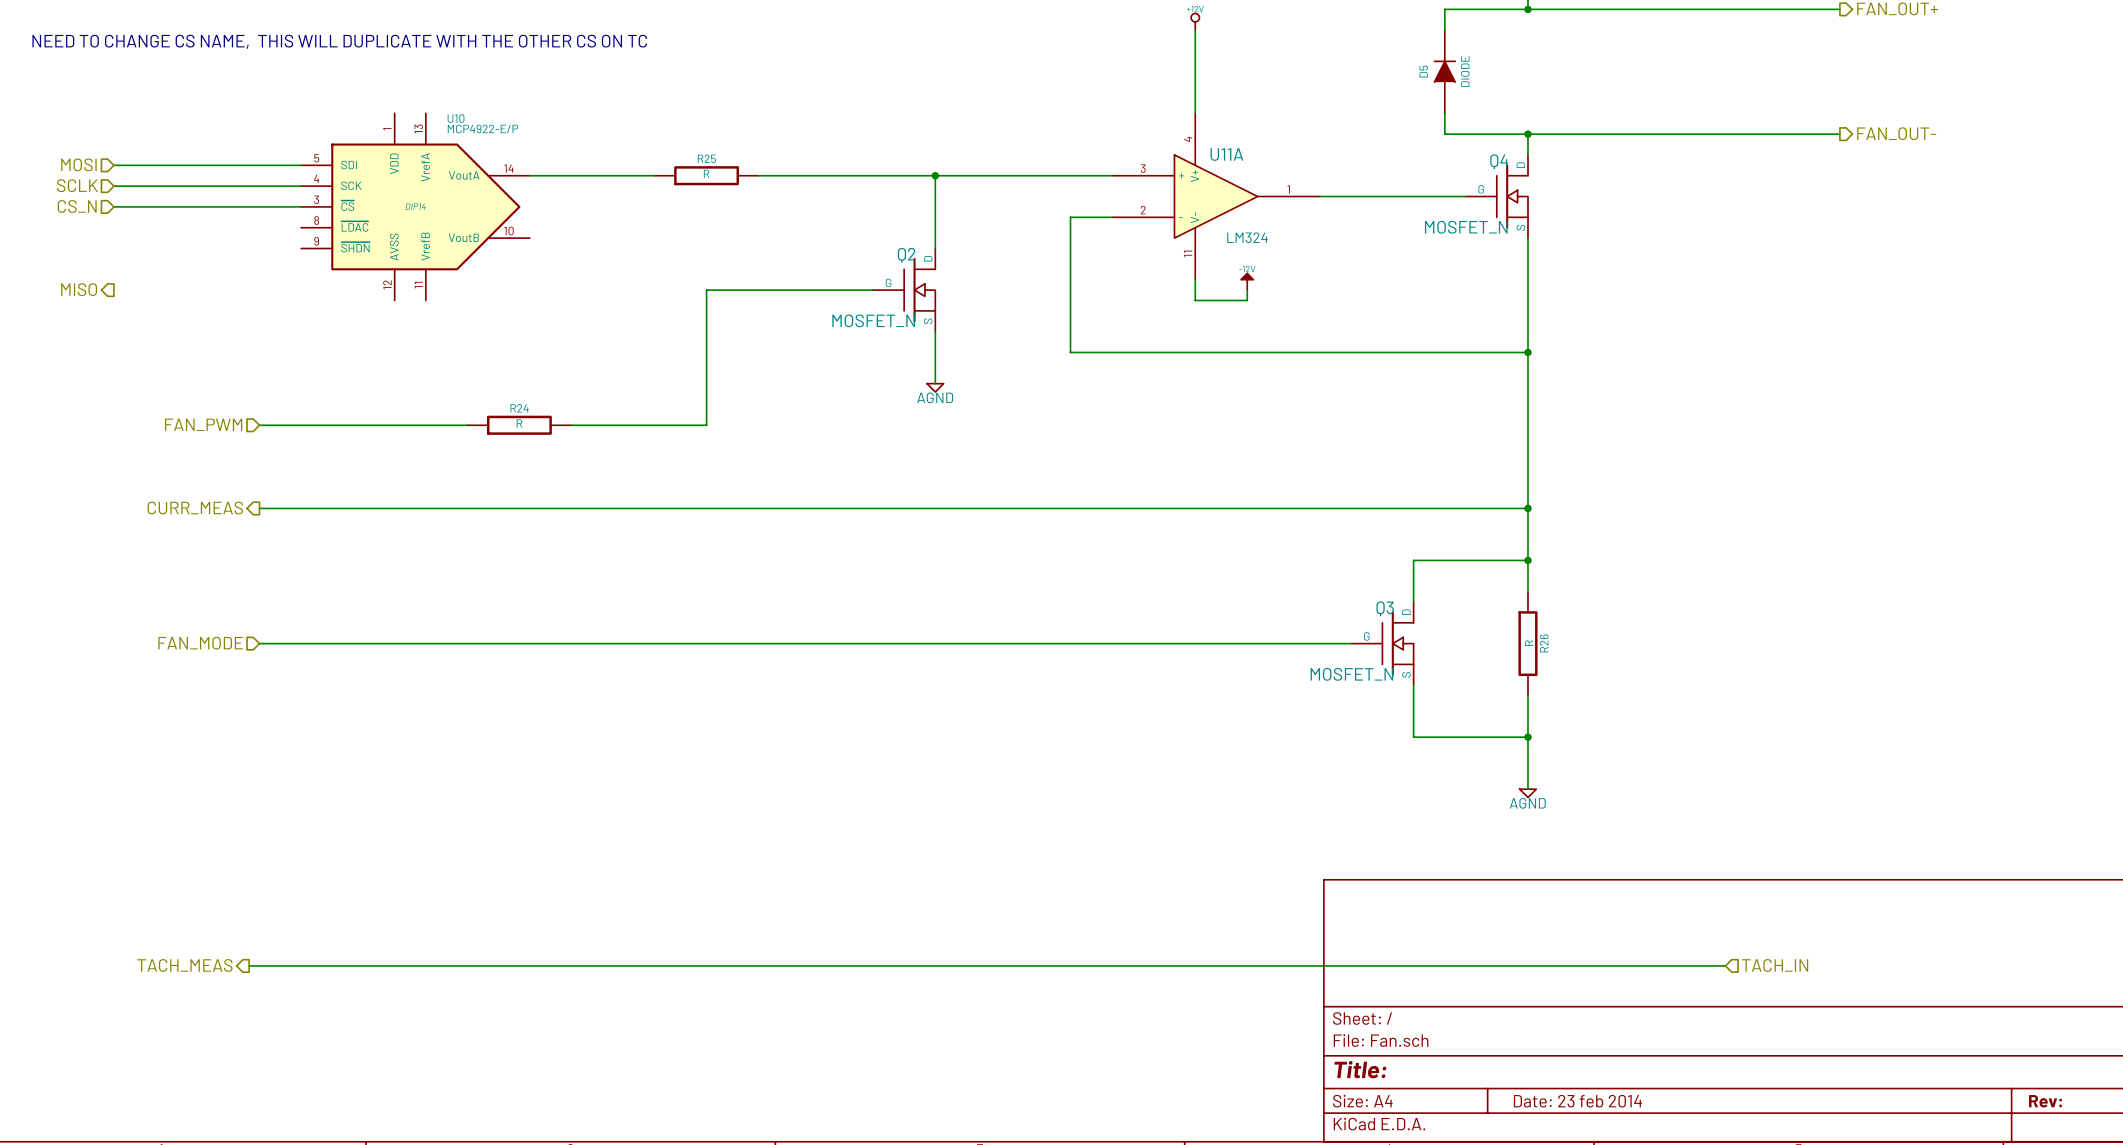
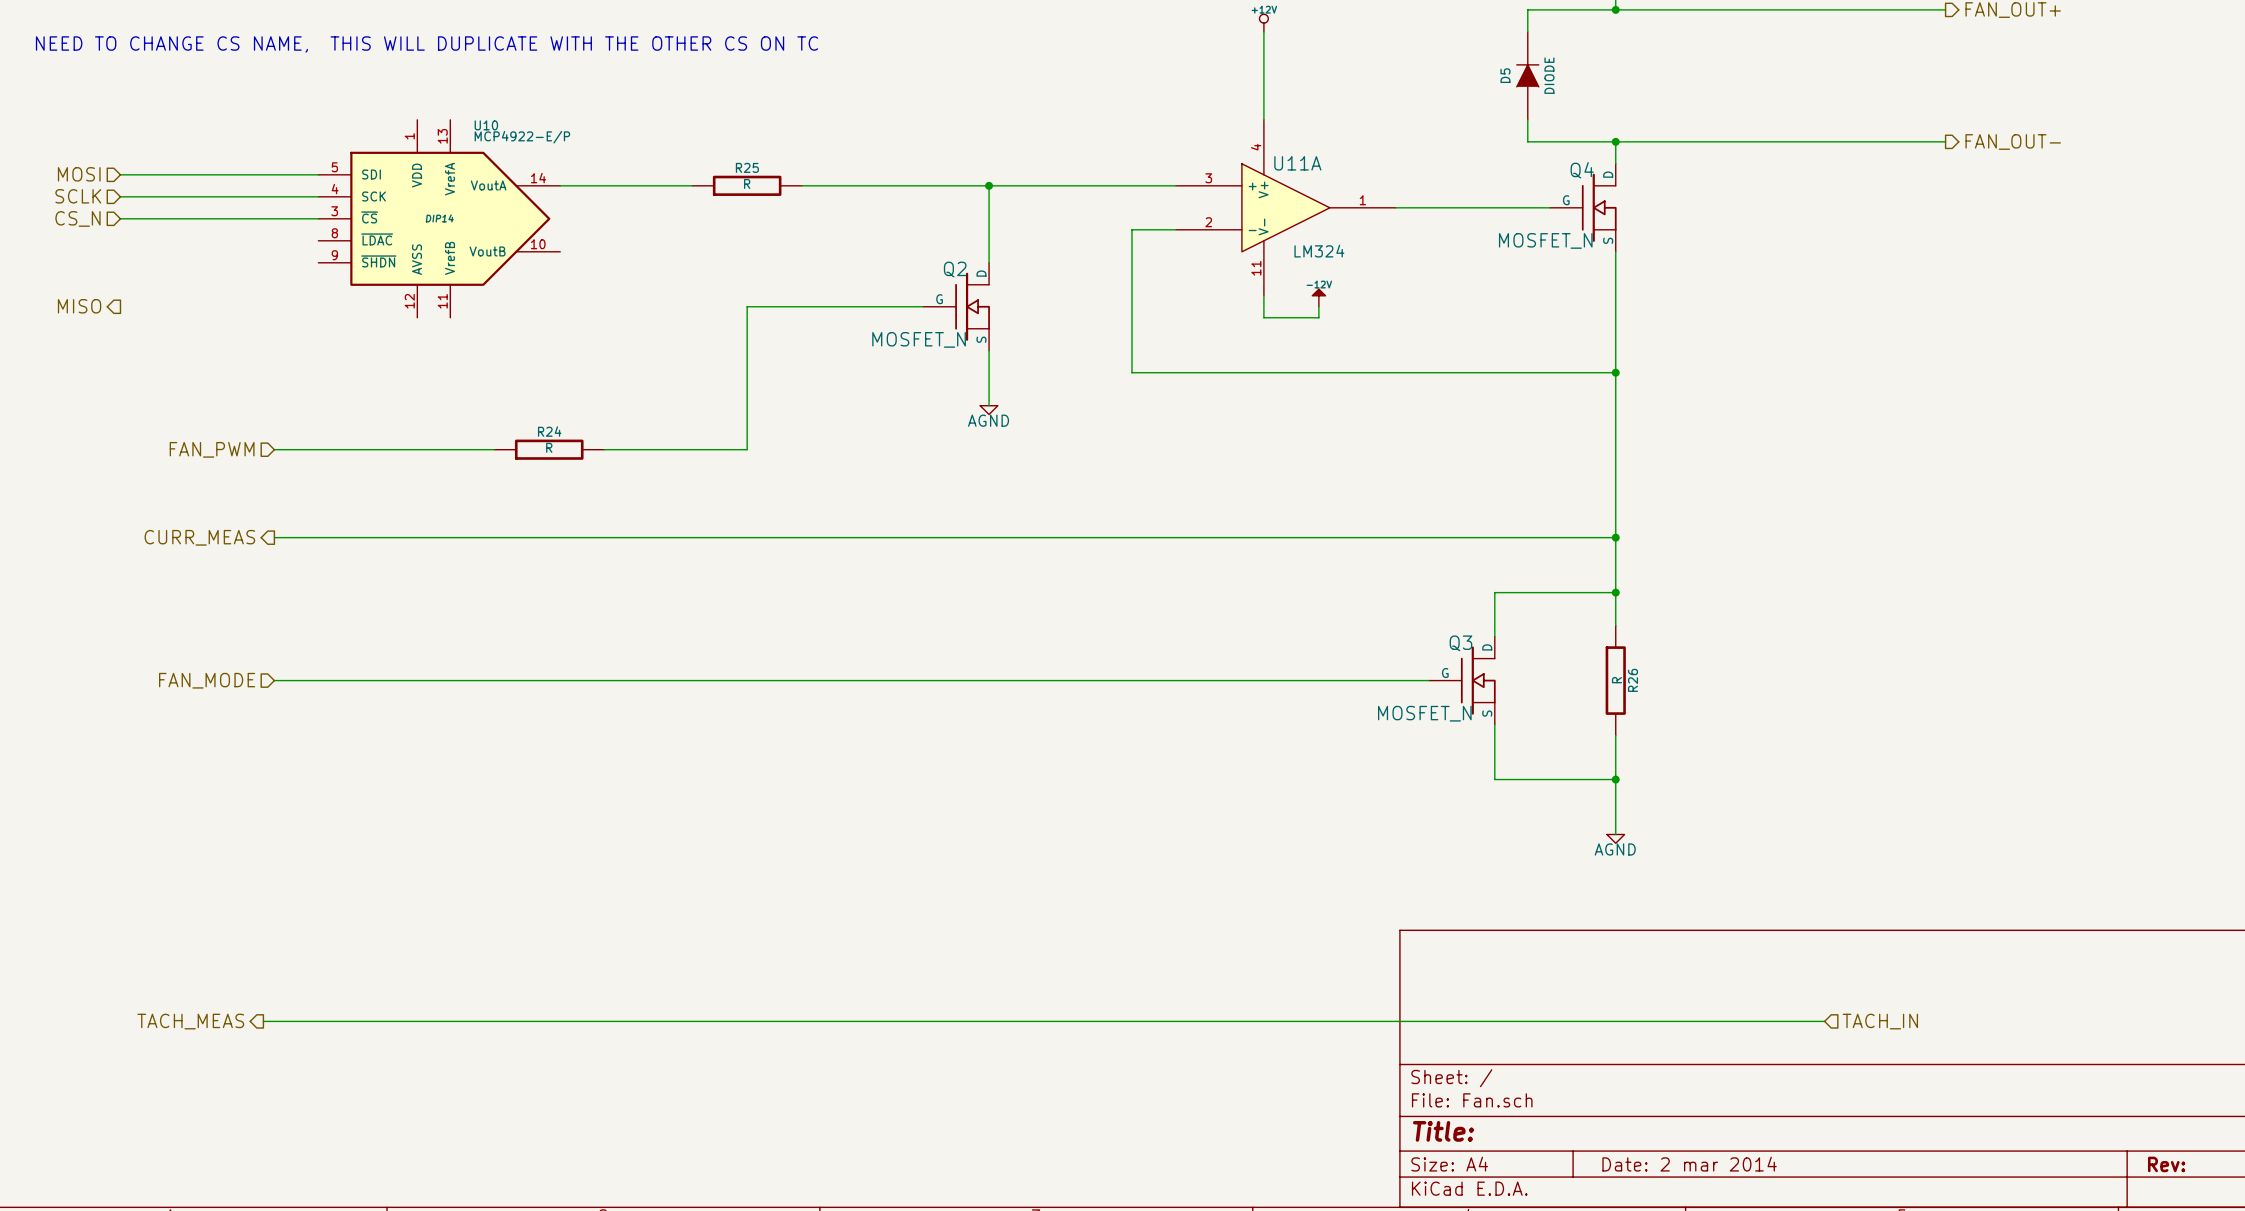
title block: Date: 23 feb 2014 (1577, 1101) -> Date: 2 mar 2014 (1689, 1164)

